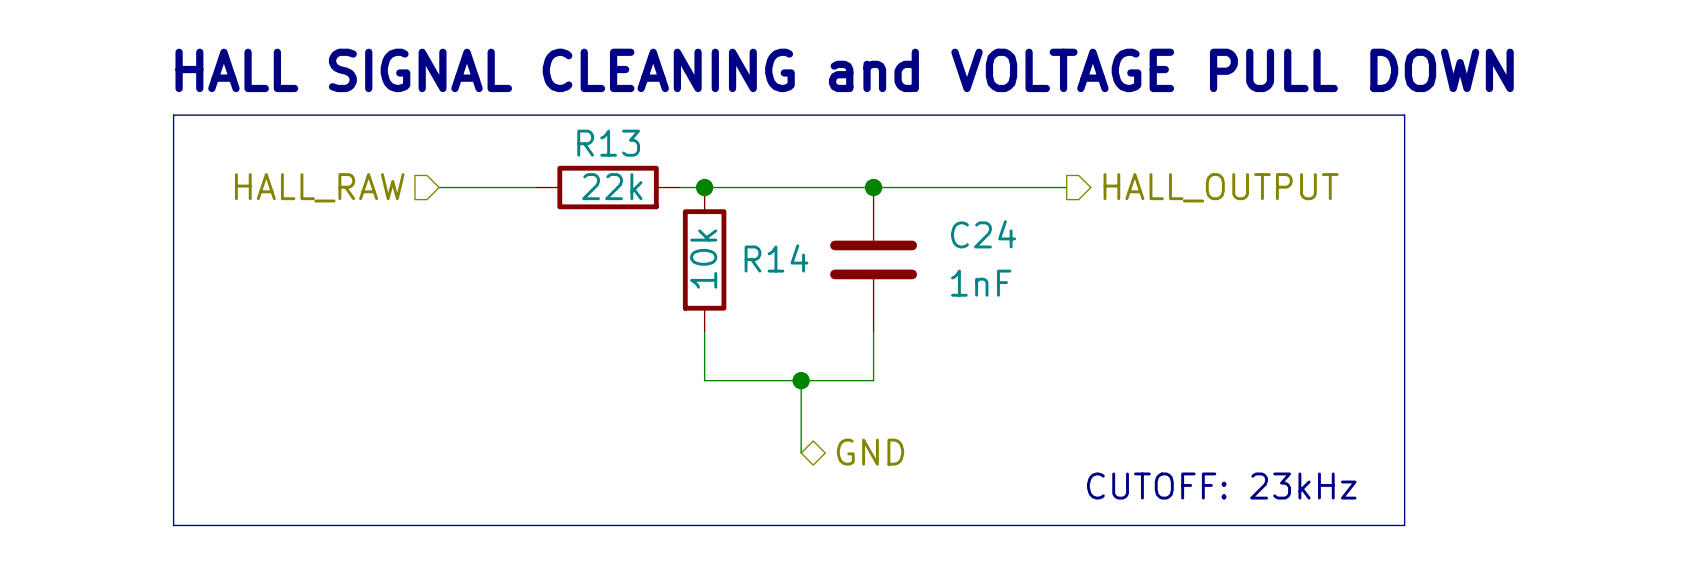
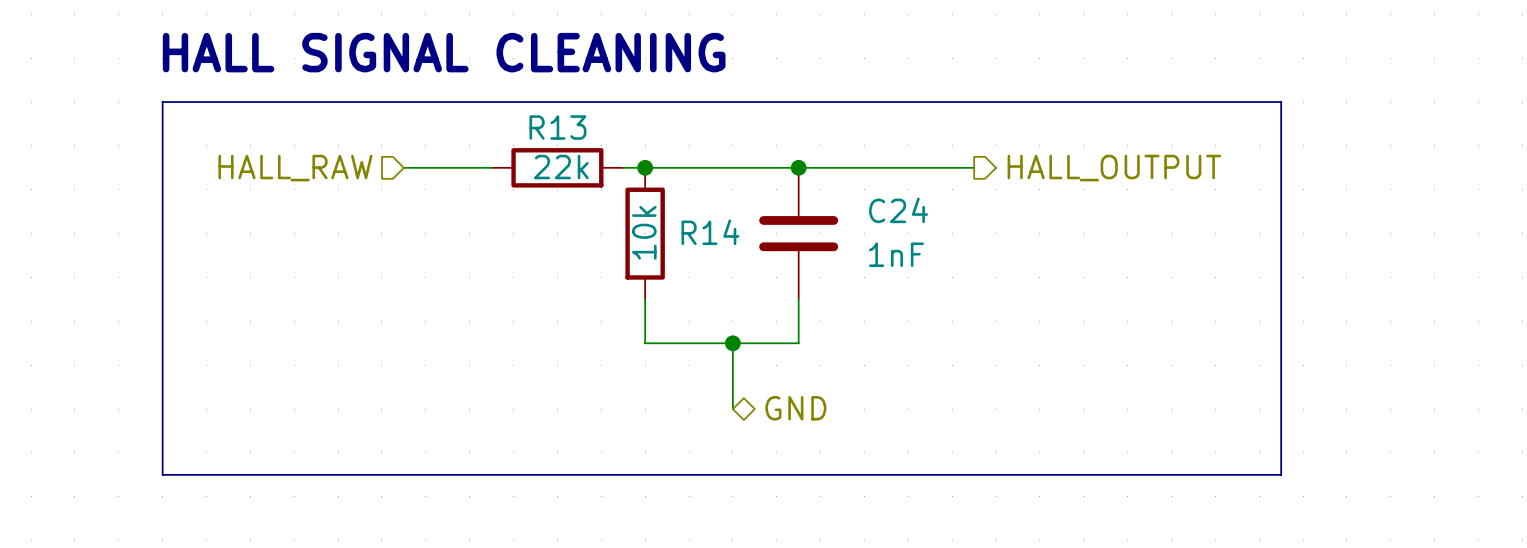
text: HALL SIGNAL CLEANING and VOLTAGE PULL DOWN (844, 70) -> HALL SIGNAL CLEANING (444, 52)
text: CUTOFF: 23kHz (1221, 486) -> none

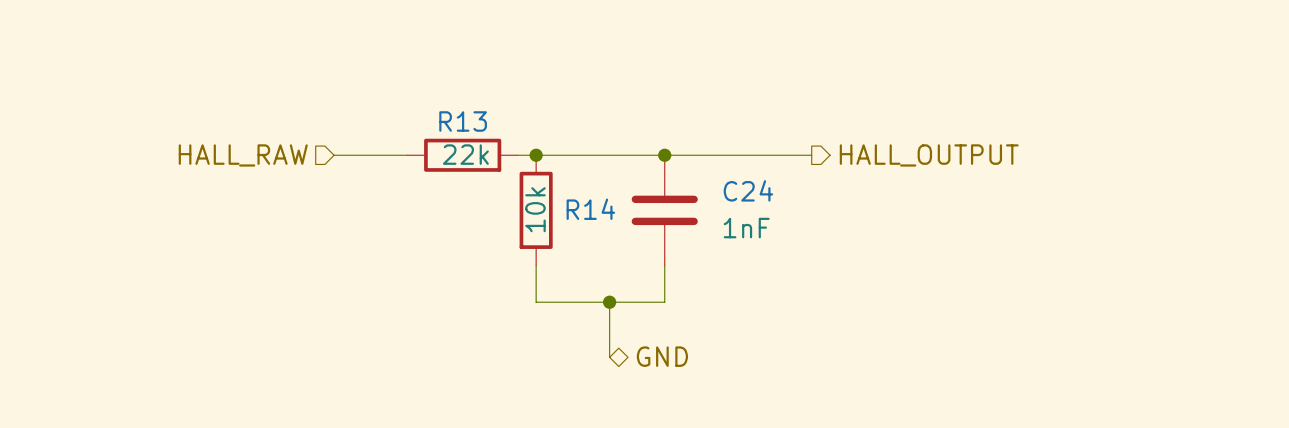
text: HALL SIGNAL CLEANING (444, 52) -> none
line: (162, 102) (1281, 102) (1281, 474) (162, 474) (162, 102) -> none

